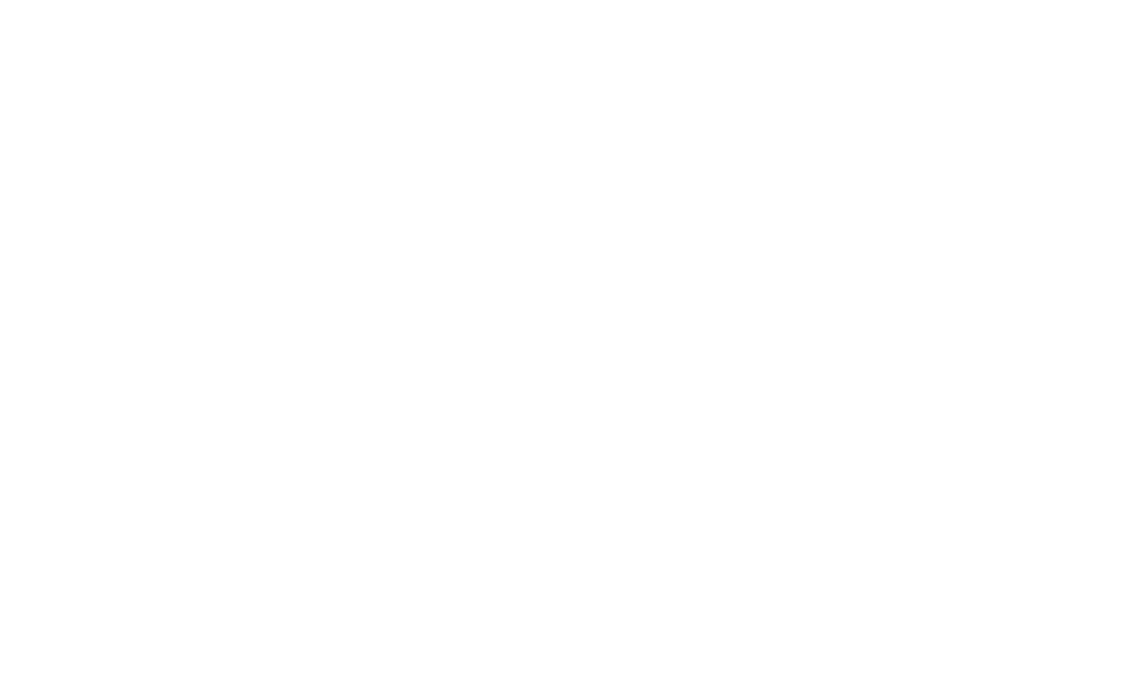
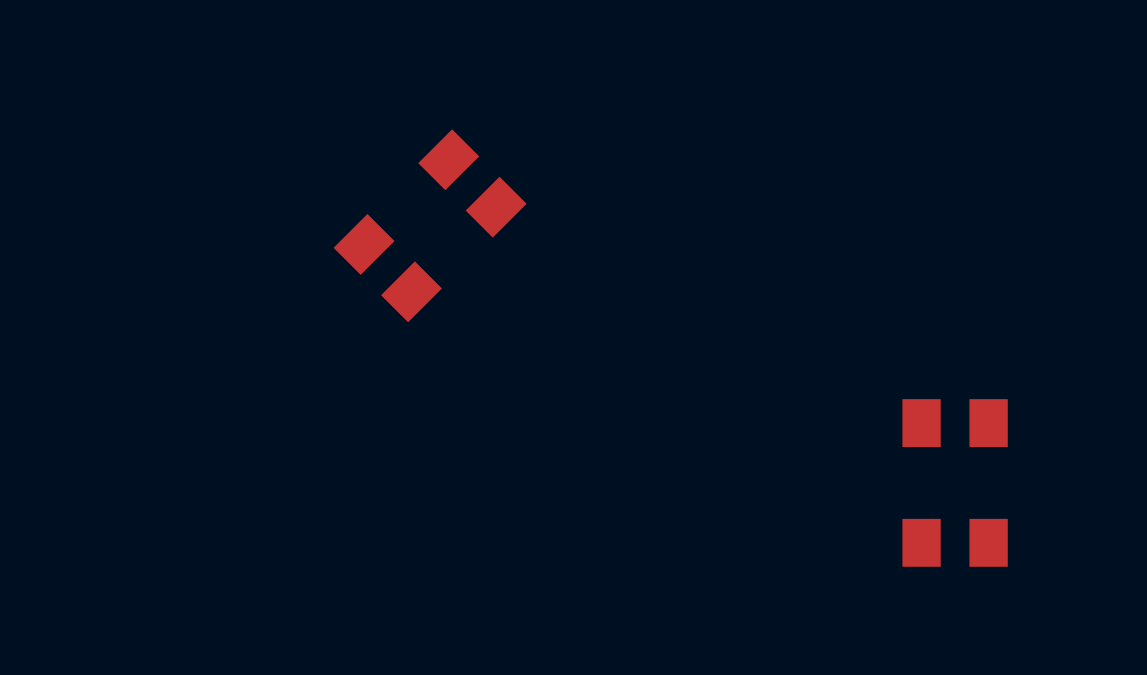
part: none -> (430, 225)
part: none -> (955, 482)

